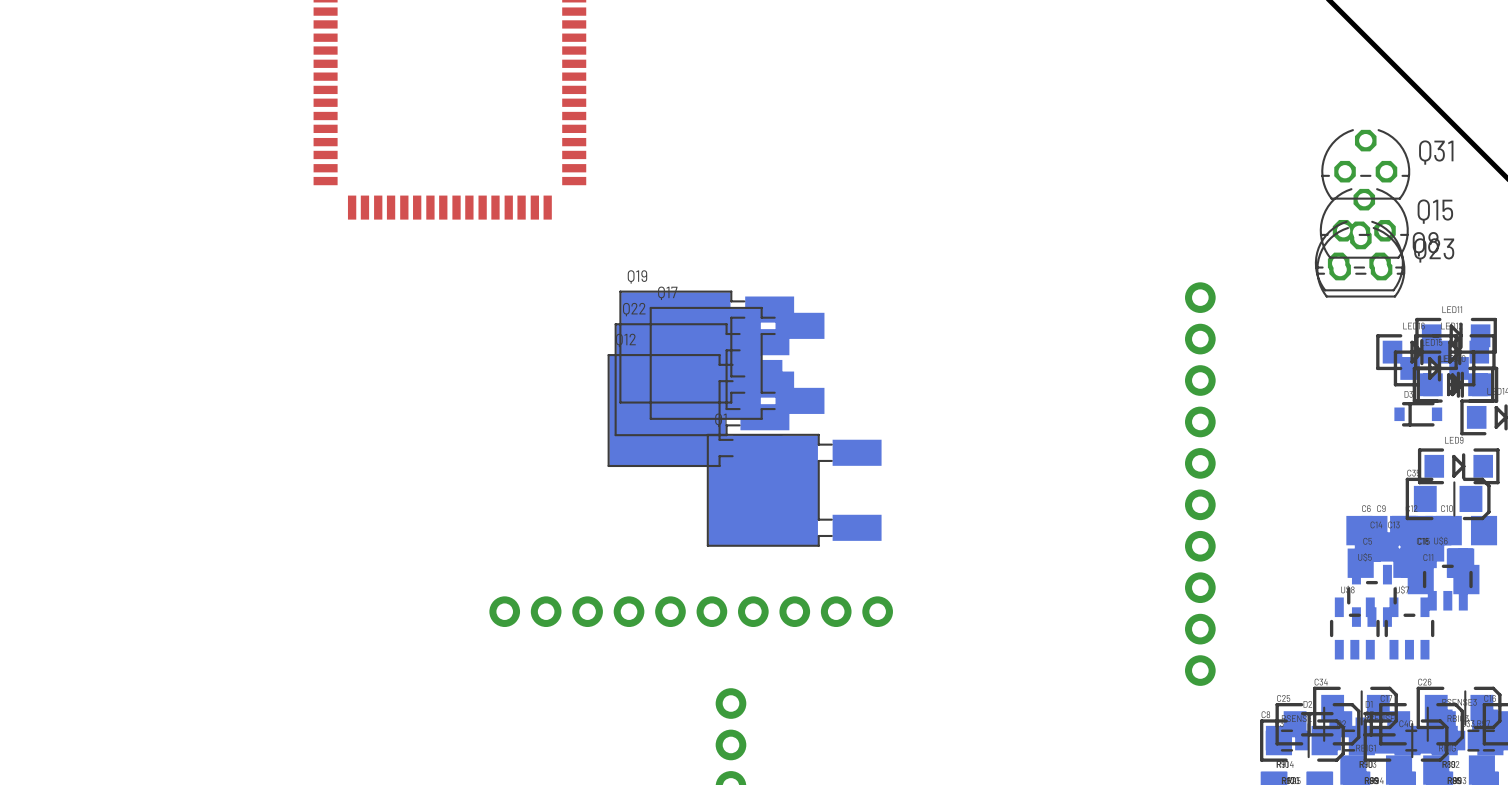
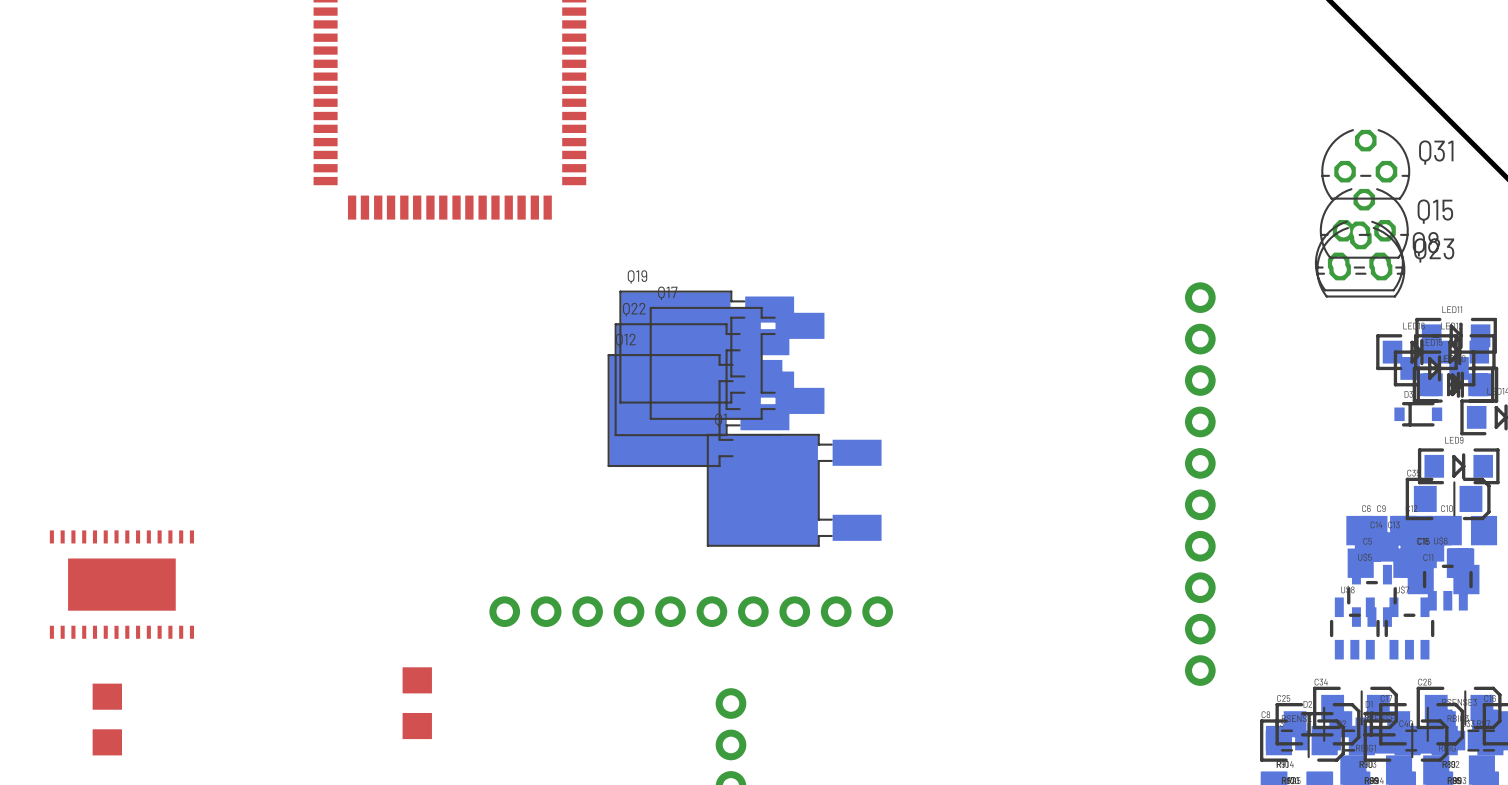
part: none -> (121, 584)
part: none -> (417, 703)
part: none -> (107, 719)

